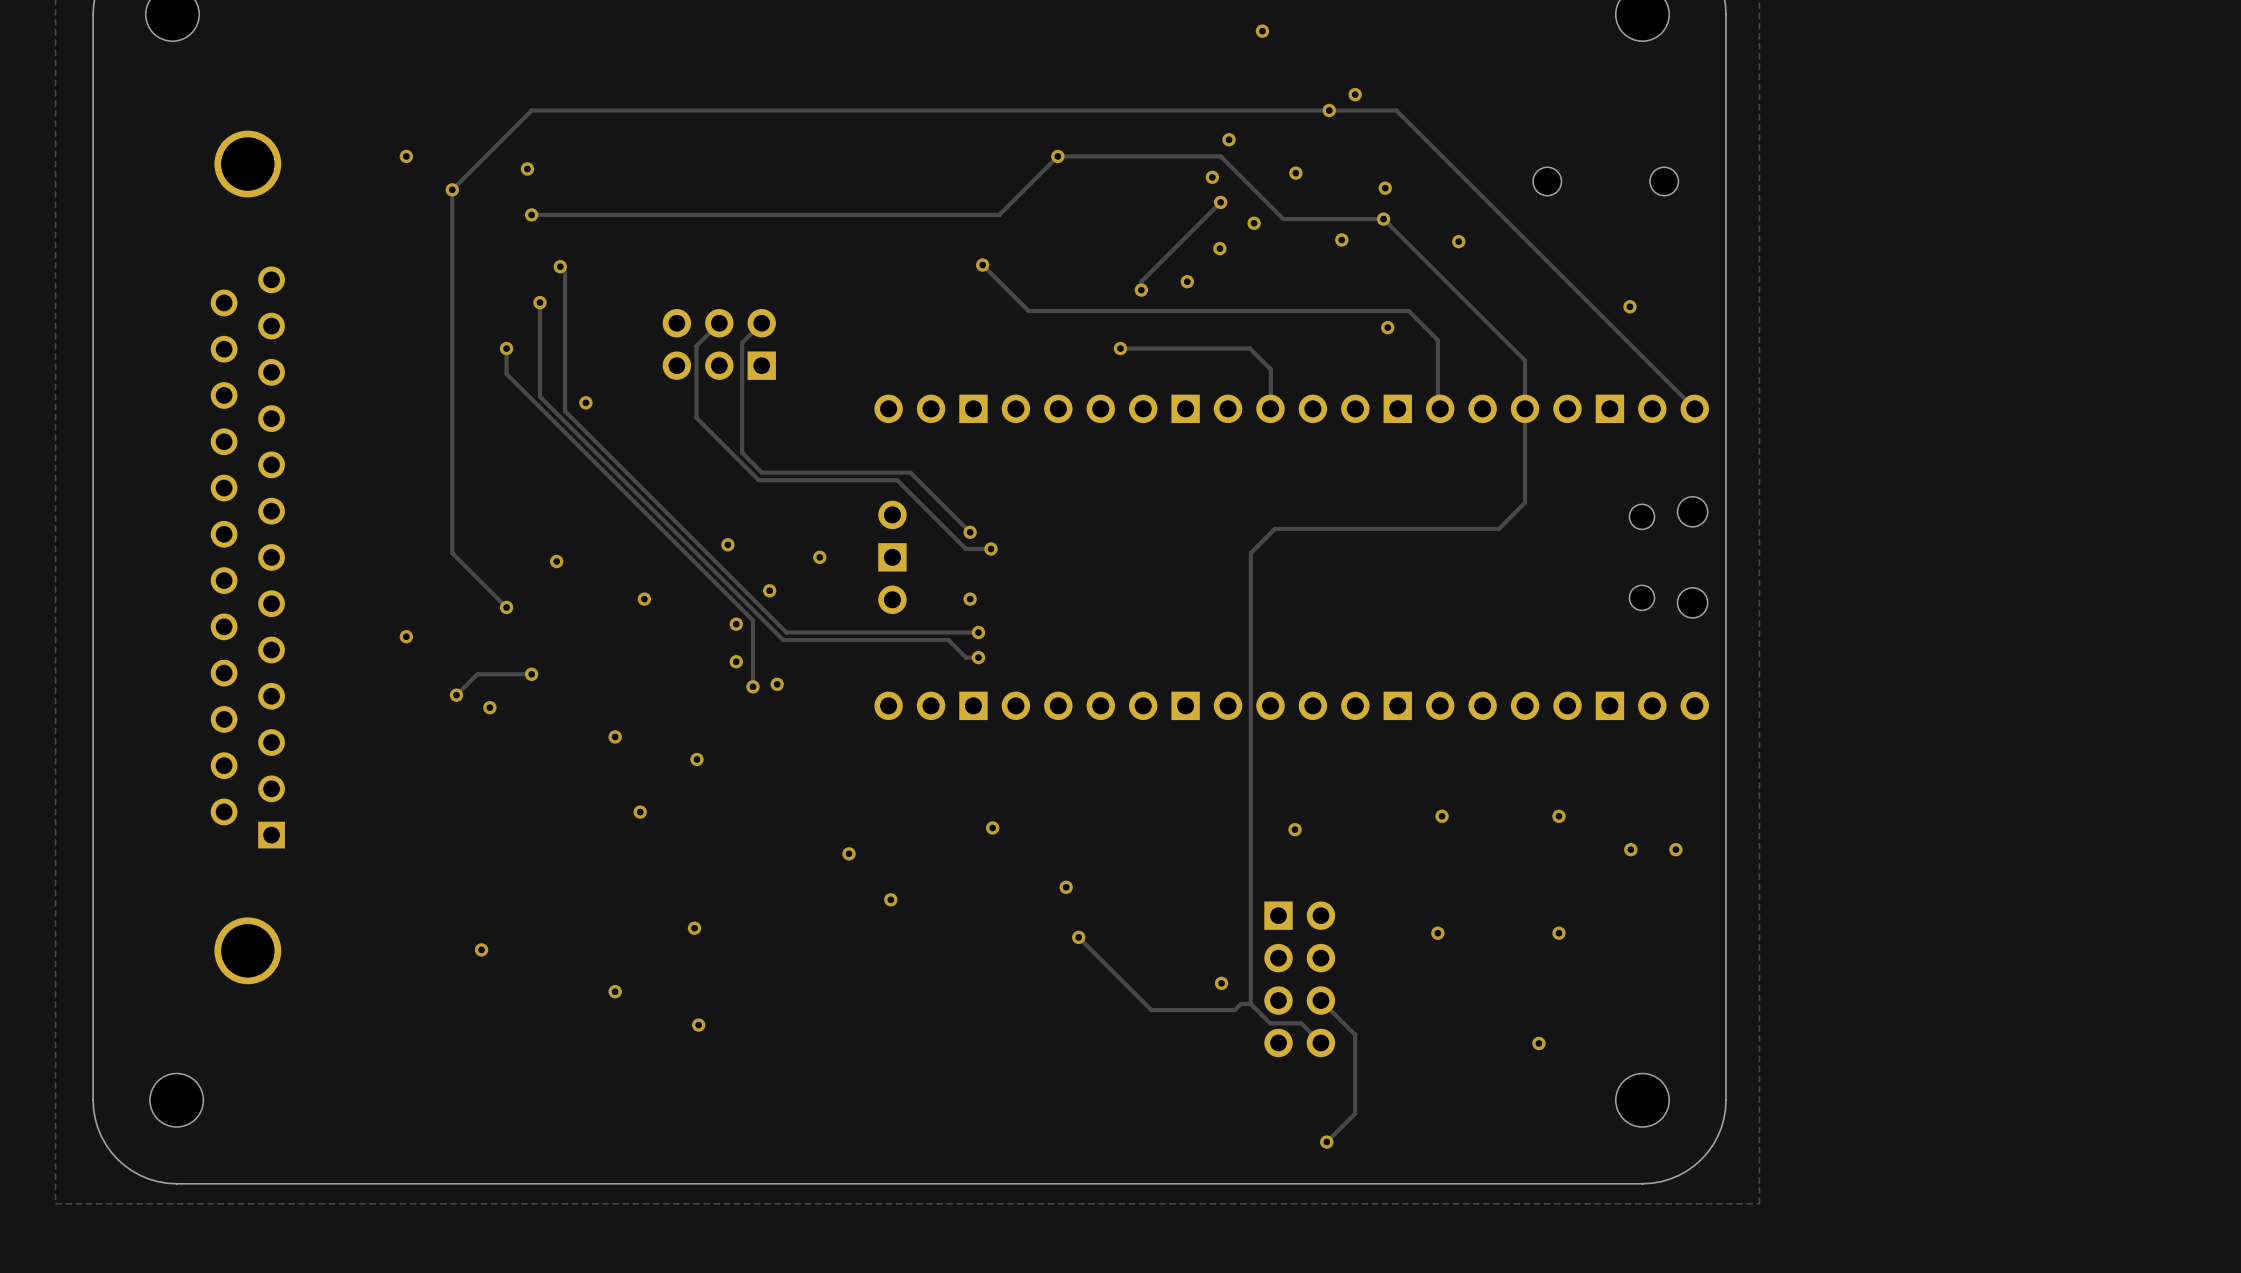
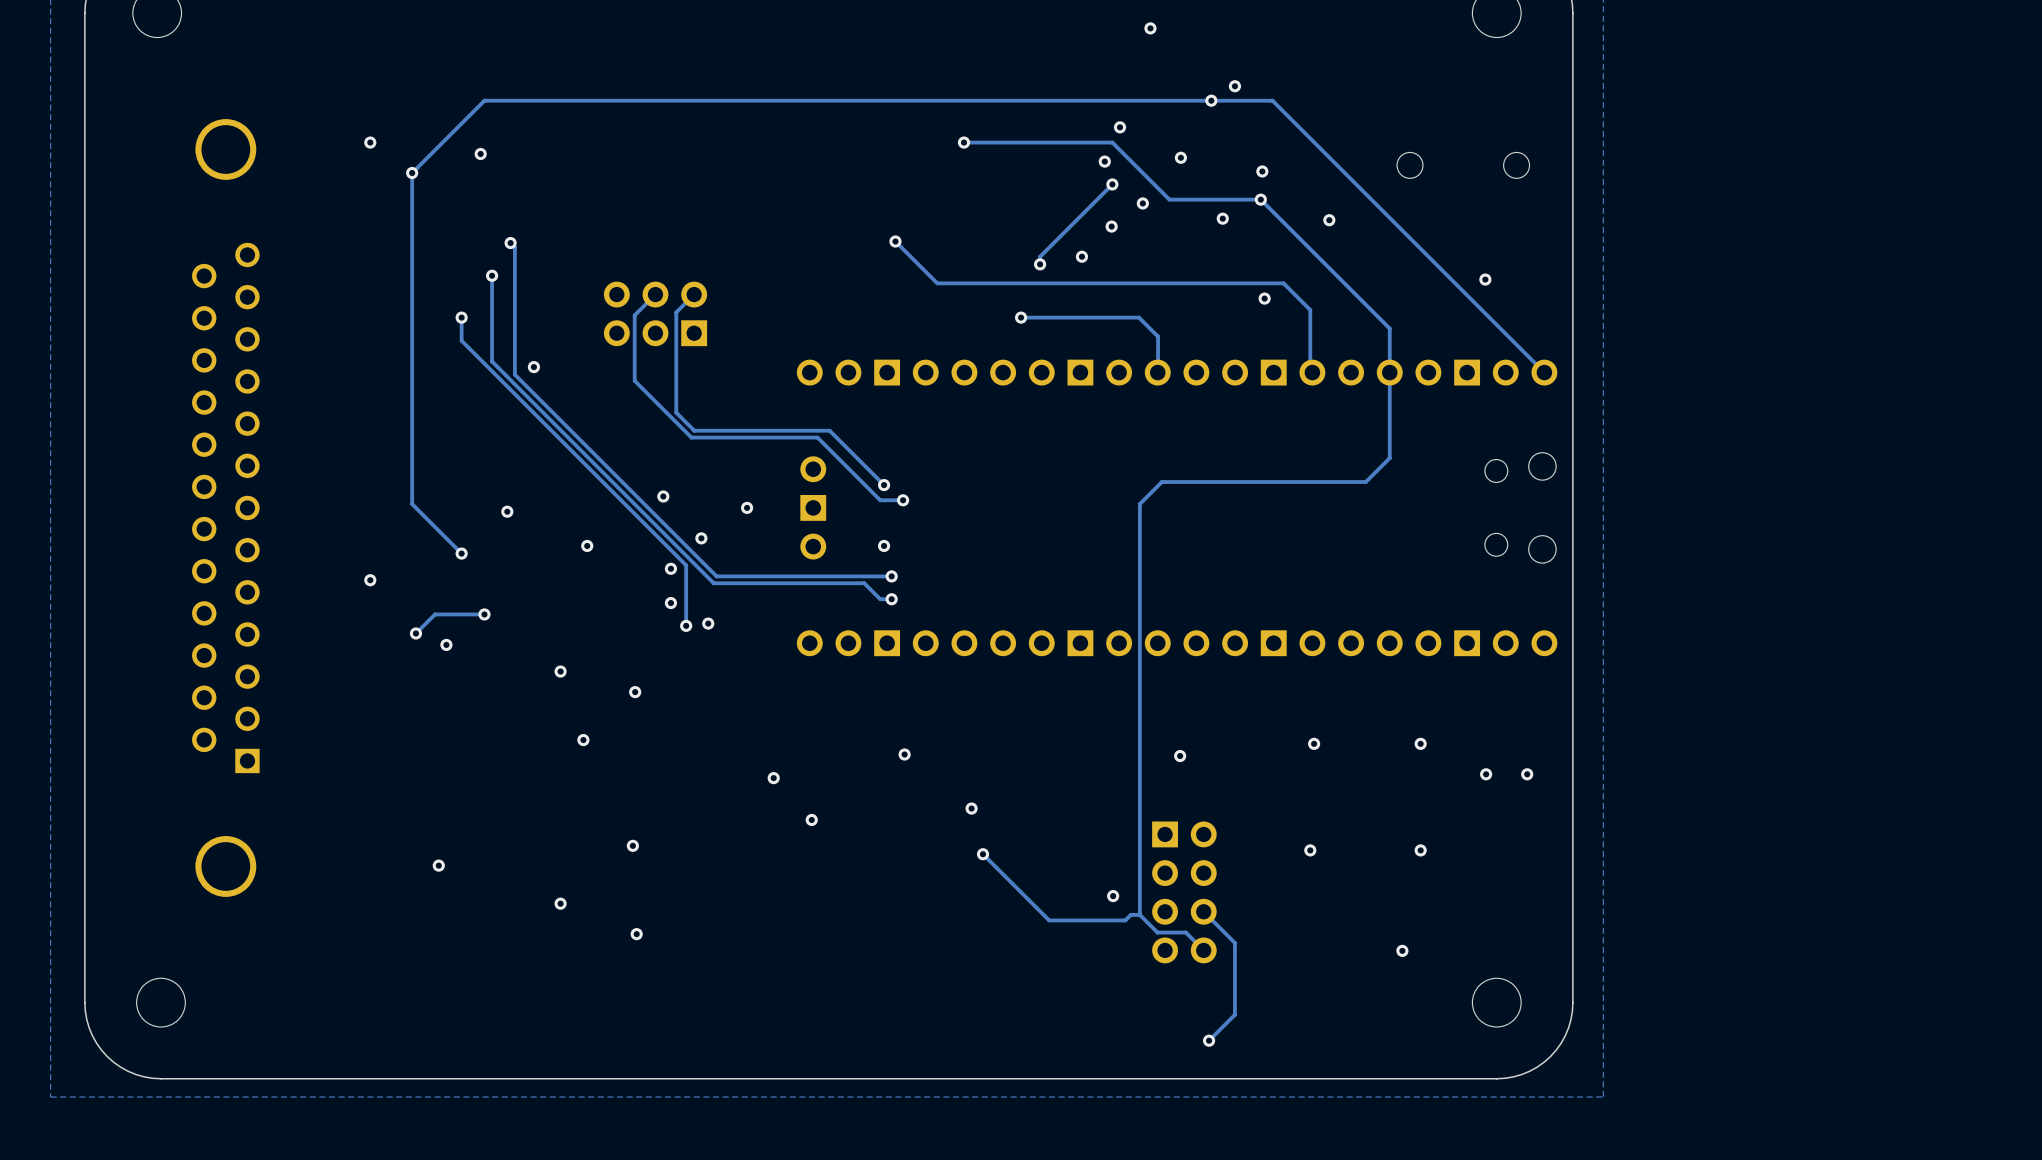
track: (1057, 156) (999, 214) (531, 214) -> none
via: (531, 214) -> none

